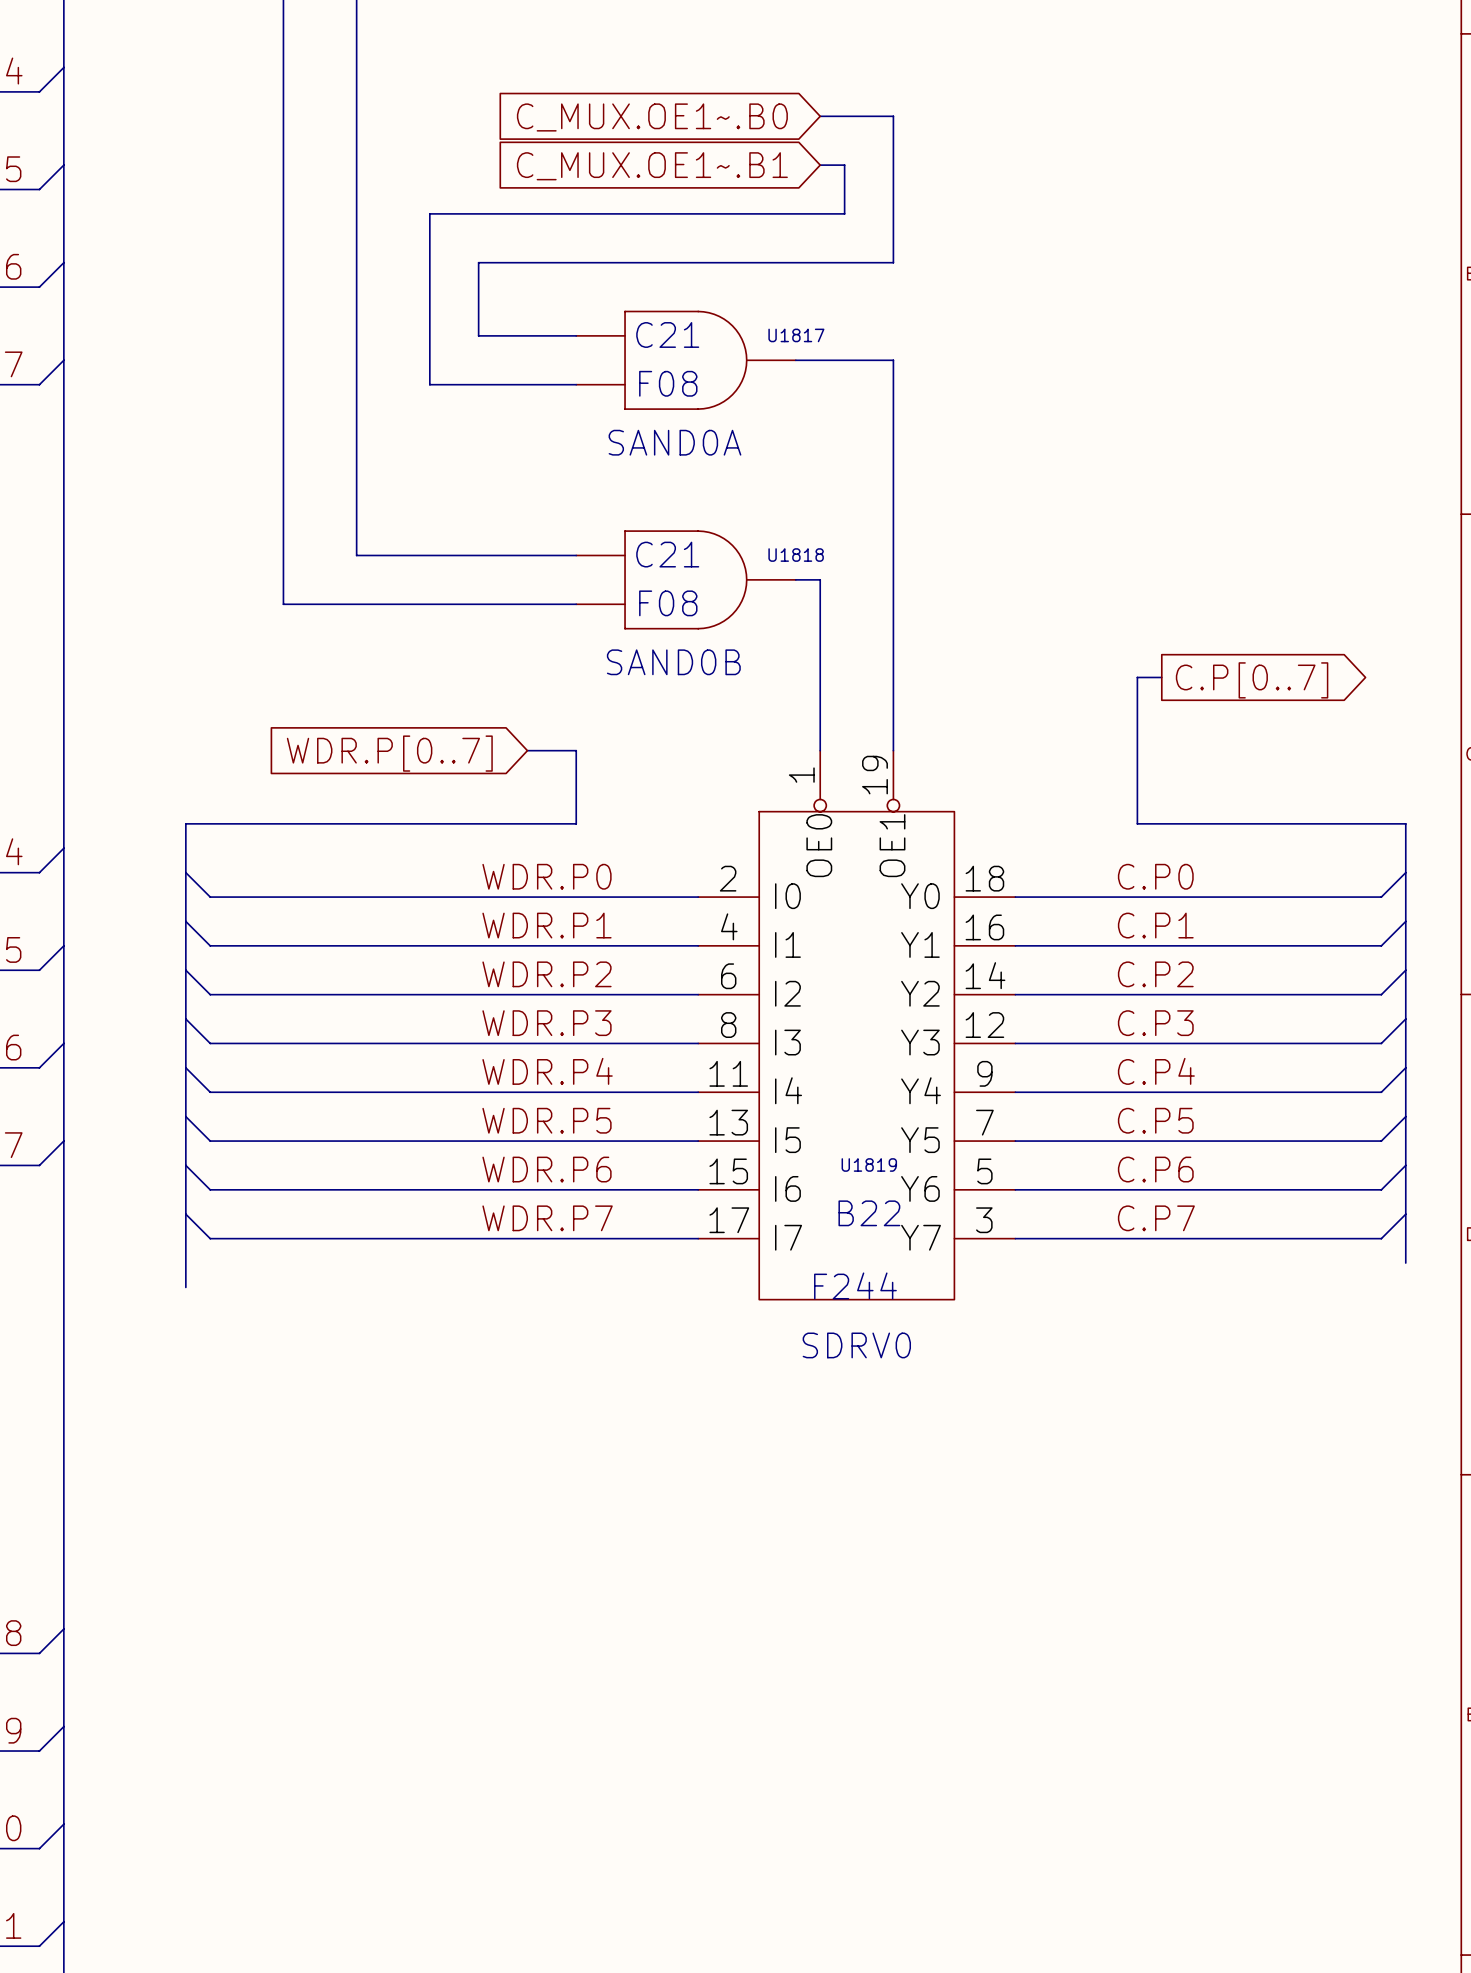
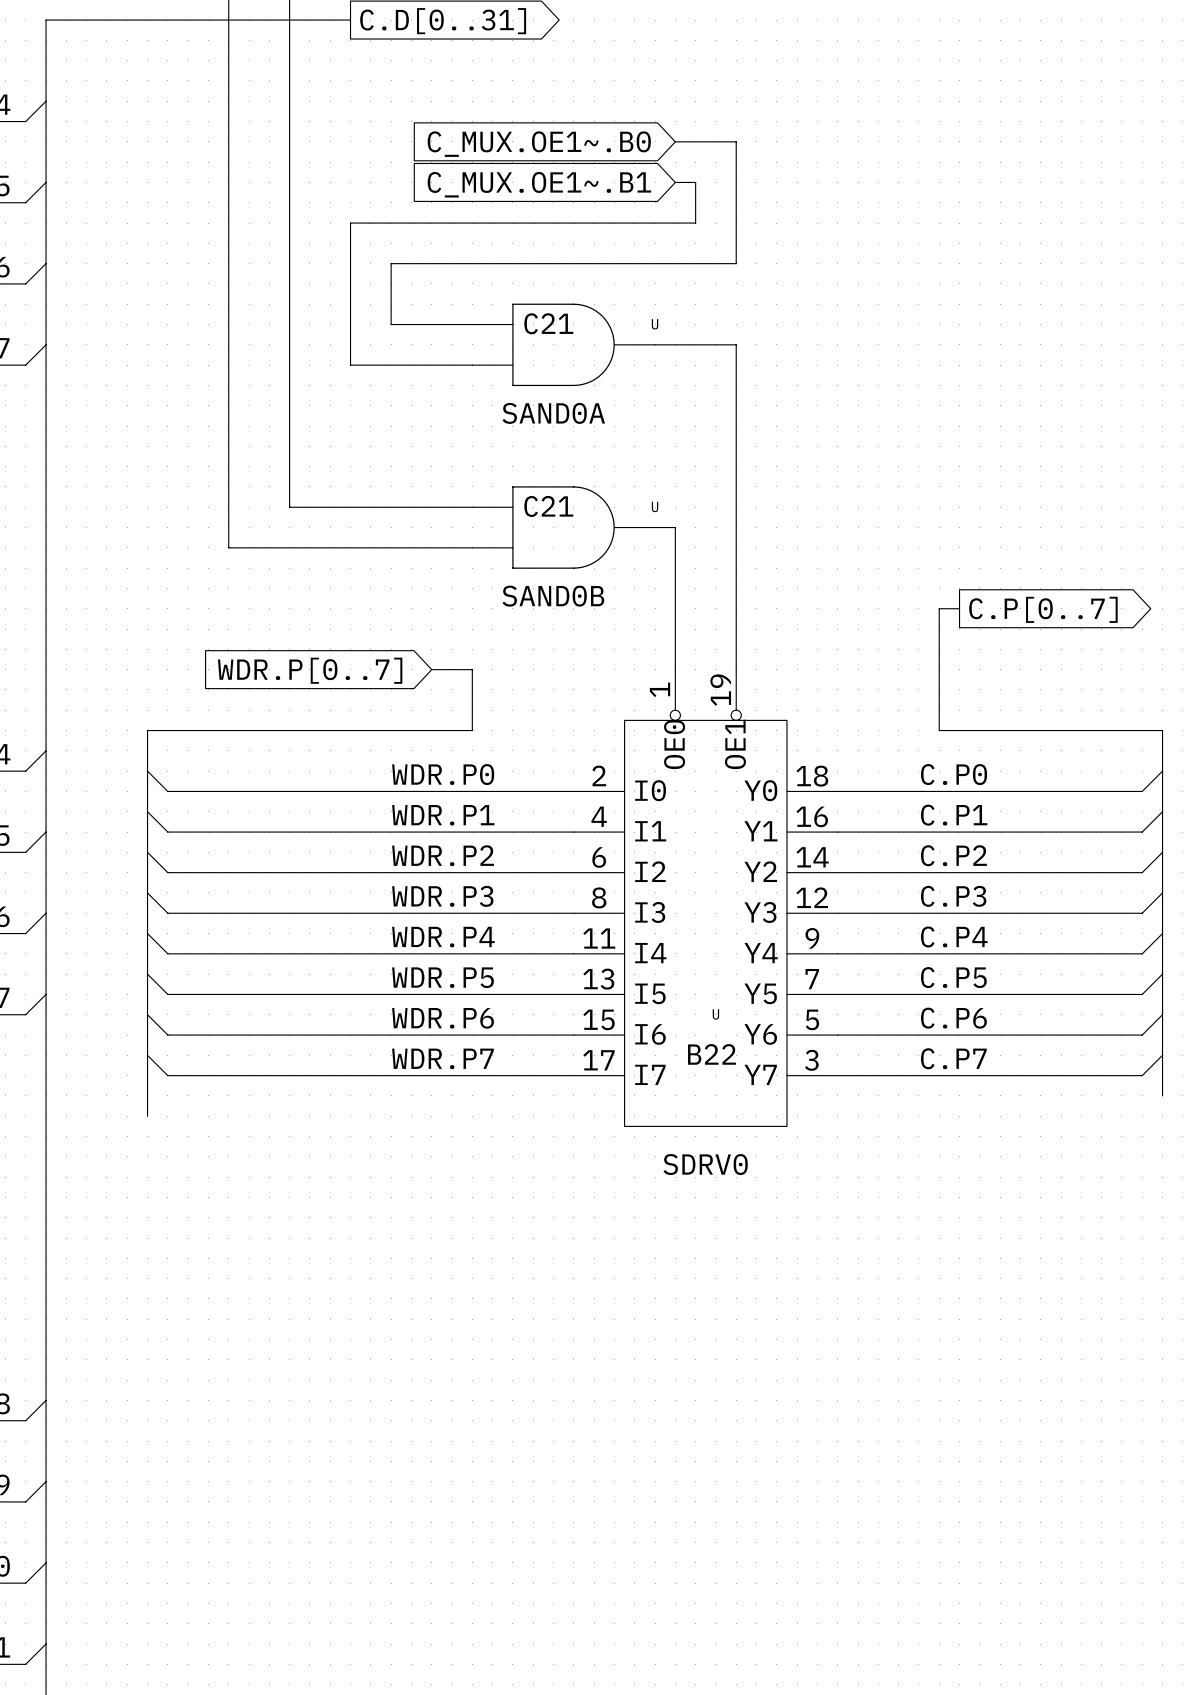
U1817 name: U1817 (796, 335) -> U (655, 324)
U1817 value: F08 (668, 383) -> none
U1818 name: U1818 (796, 555) -> U (655, 506)
U1818 value: F08 (668, 603) -> none
U1819 name: U1819 (869, 1164) -> U (715, 1014)
U1819 value: F244 (855, 1285) -> none

